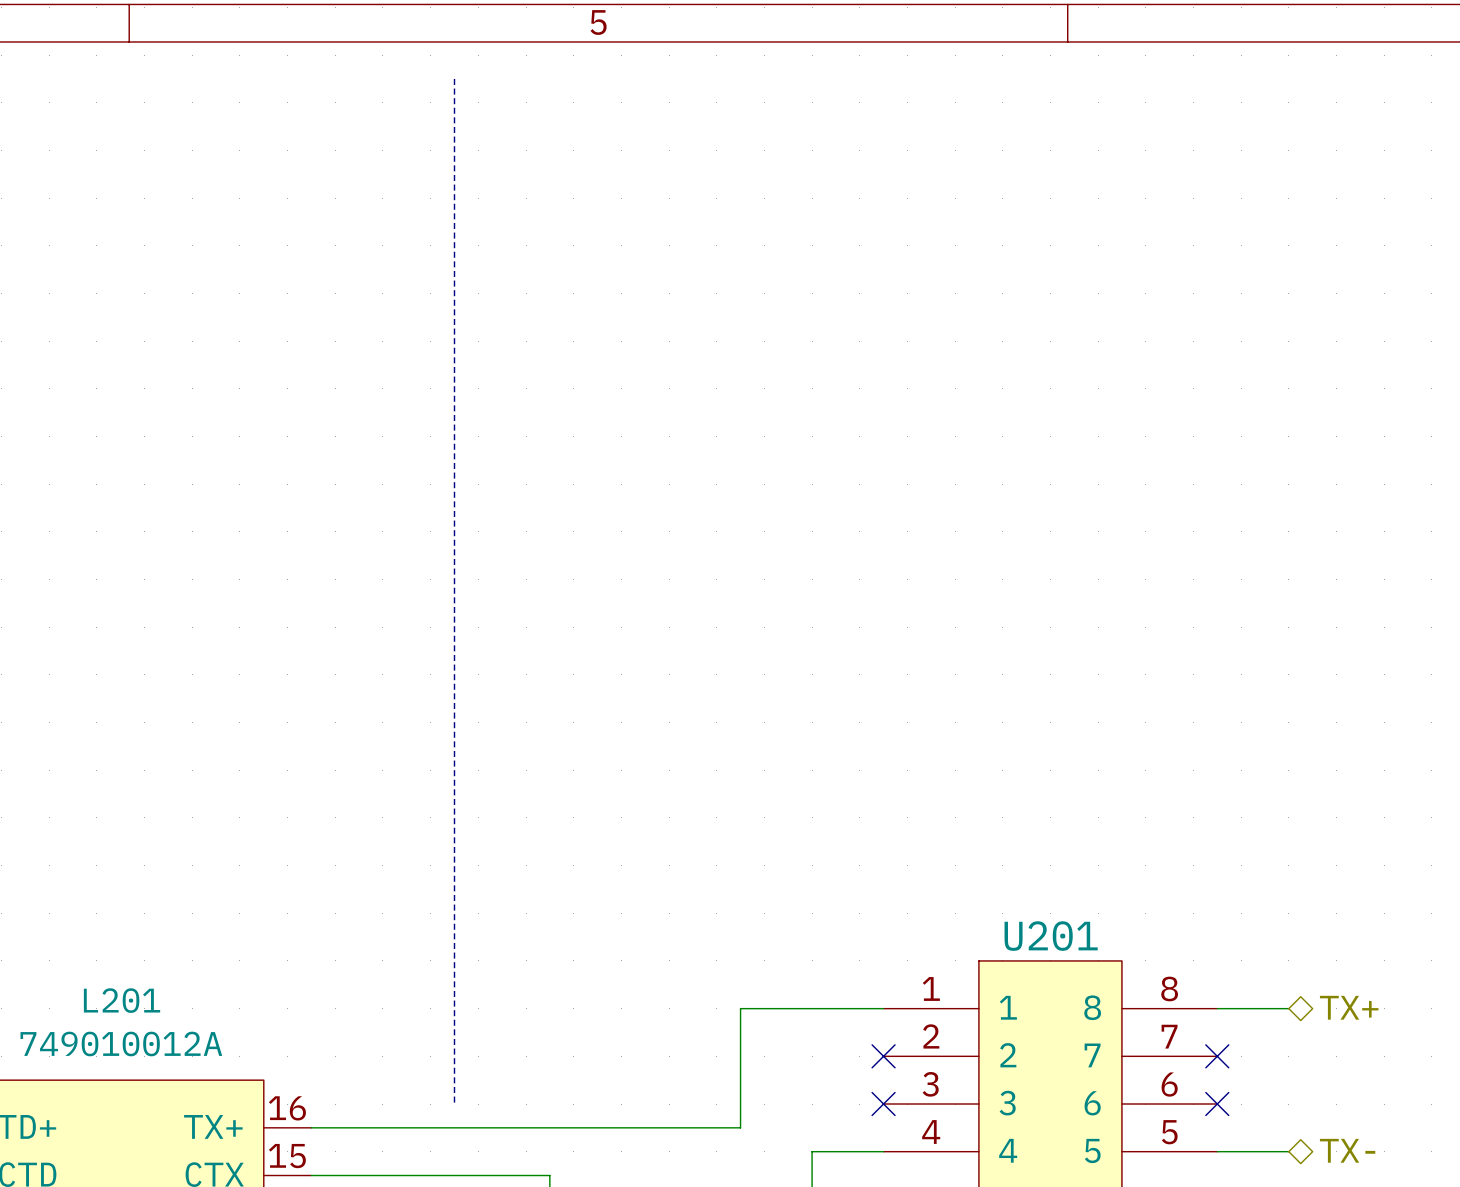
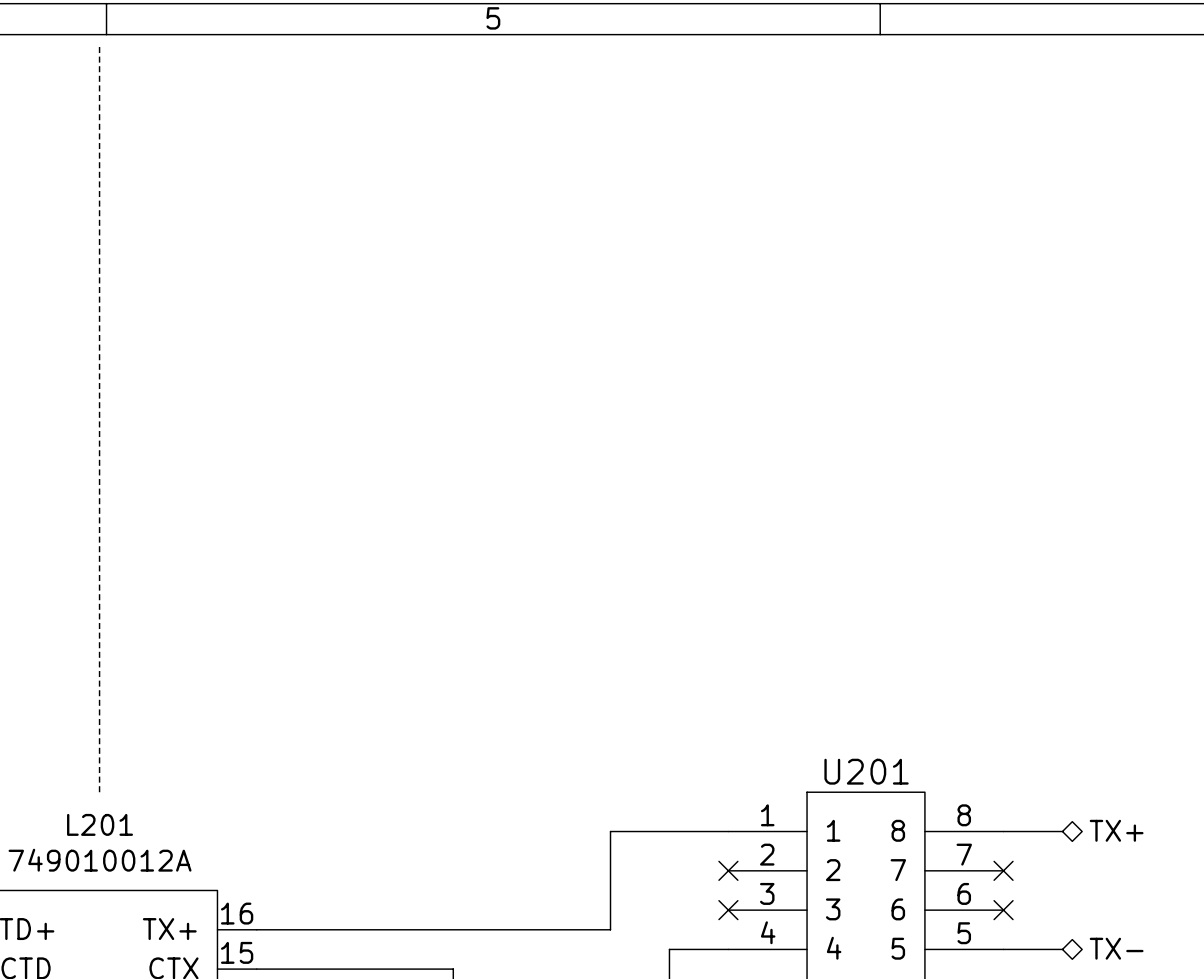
line: none -> (99, 45) (99, 792)
line: (454, 78) (454, 1104) -> none

